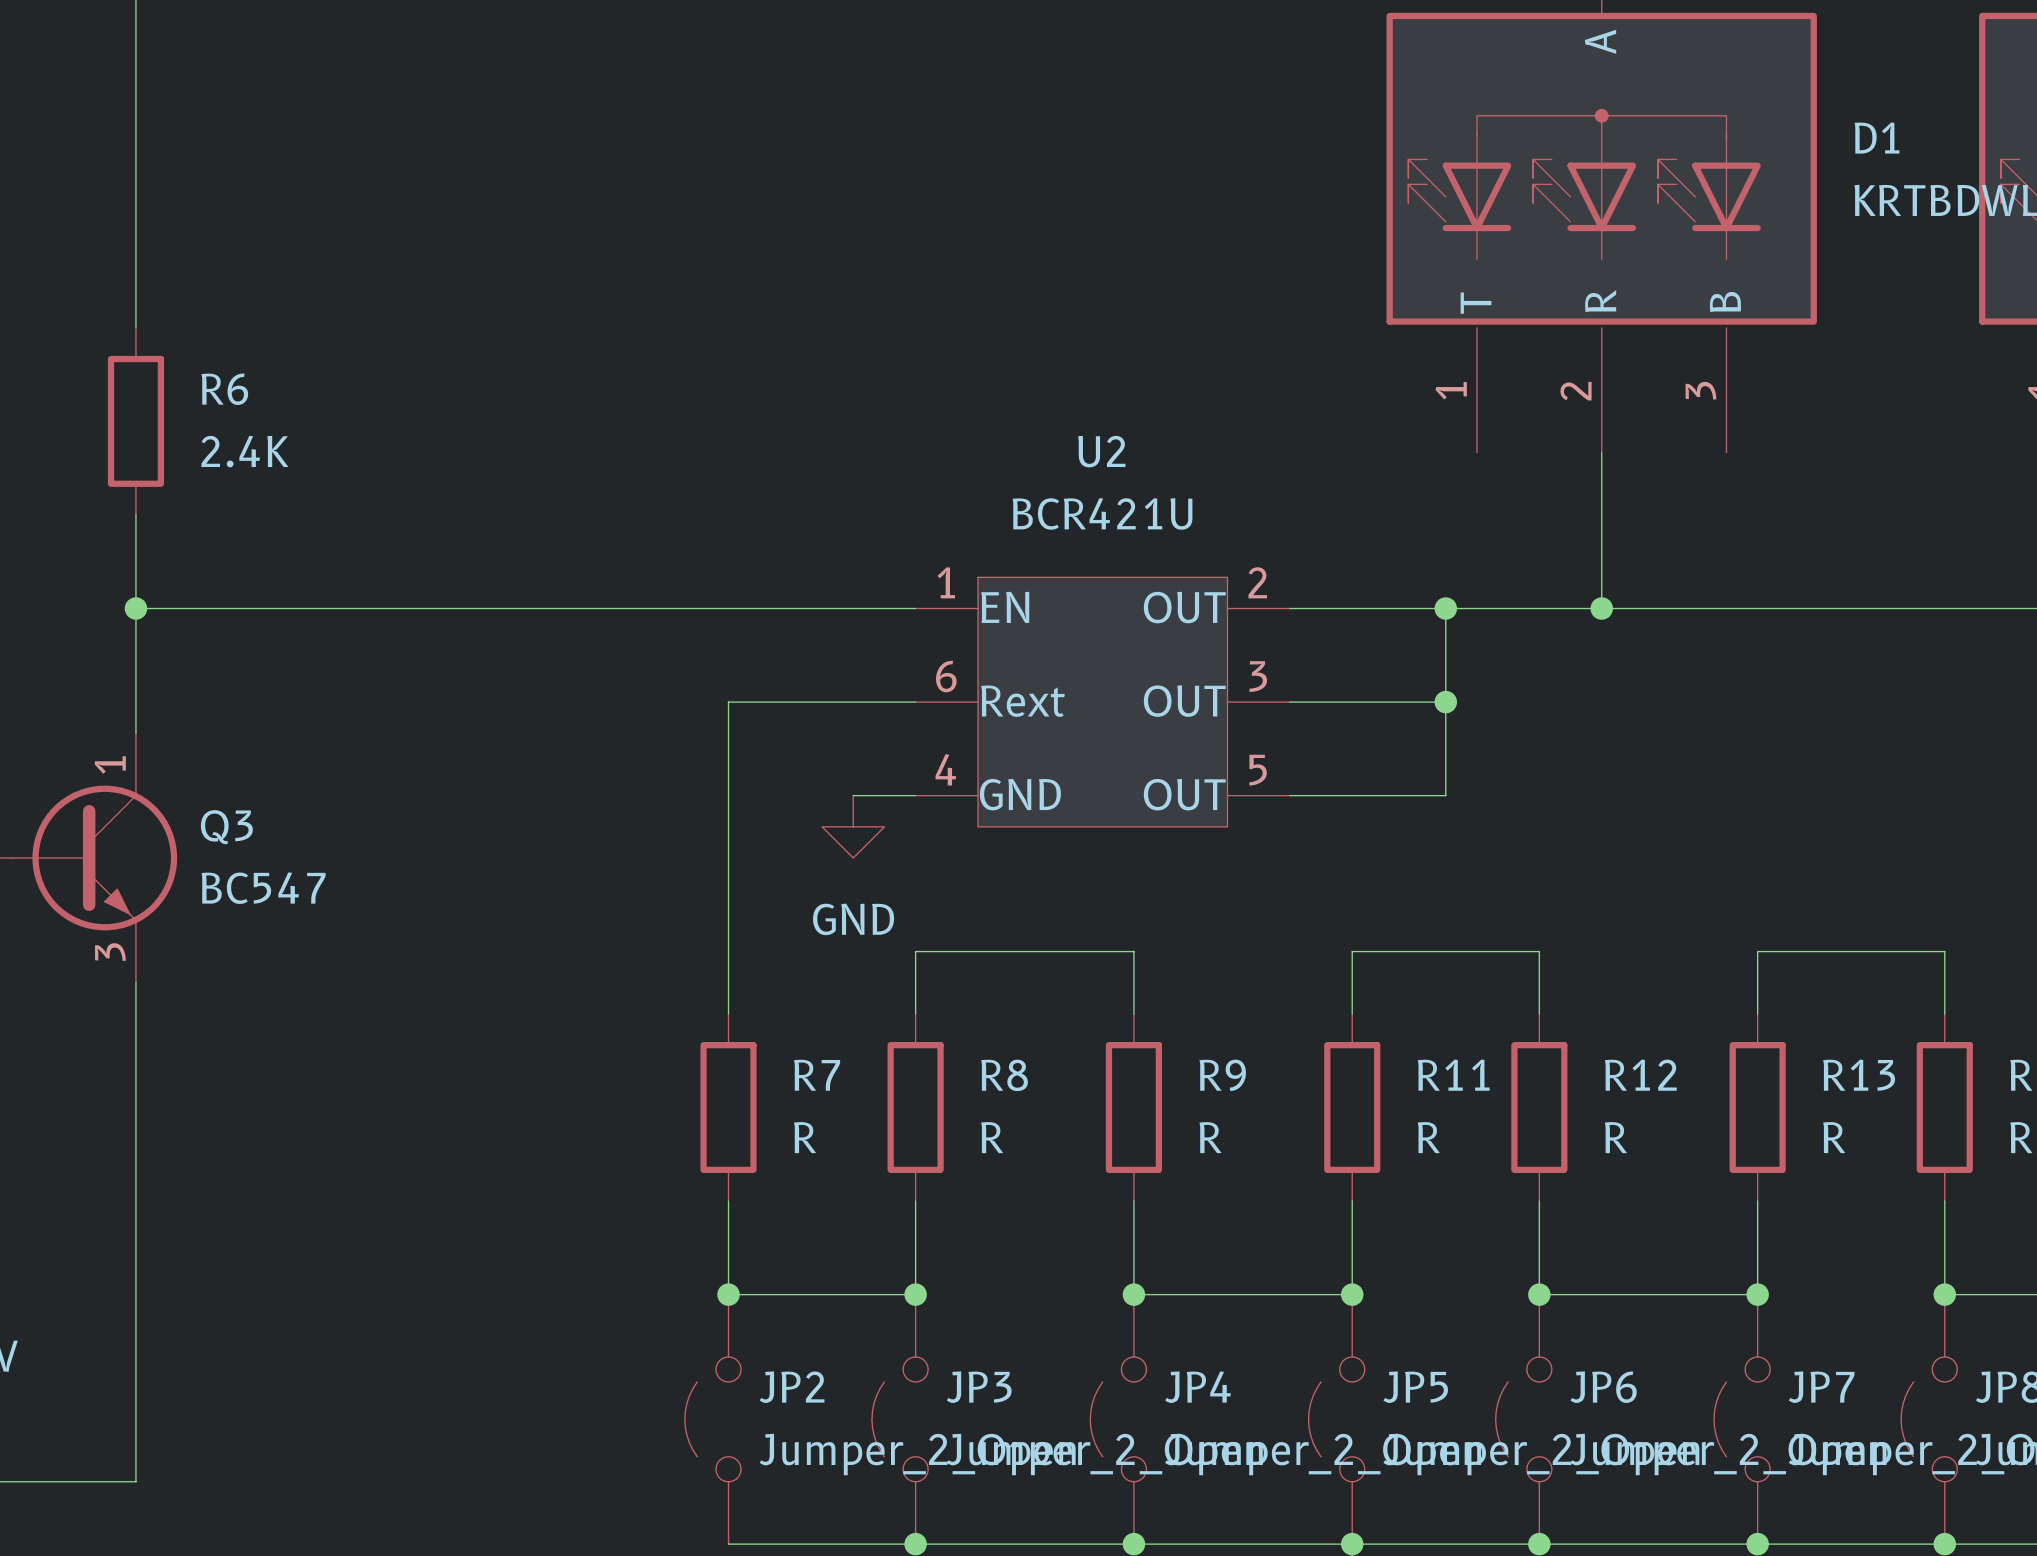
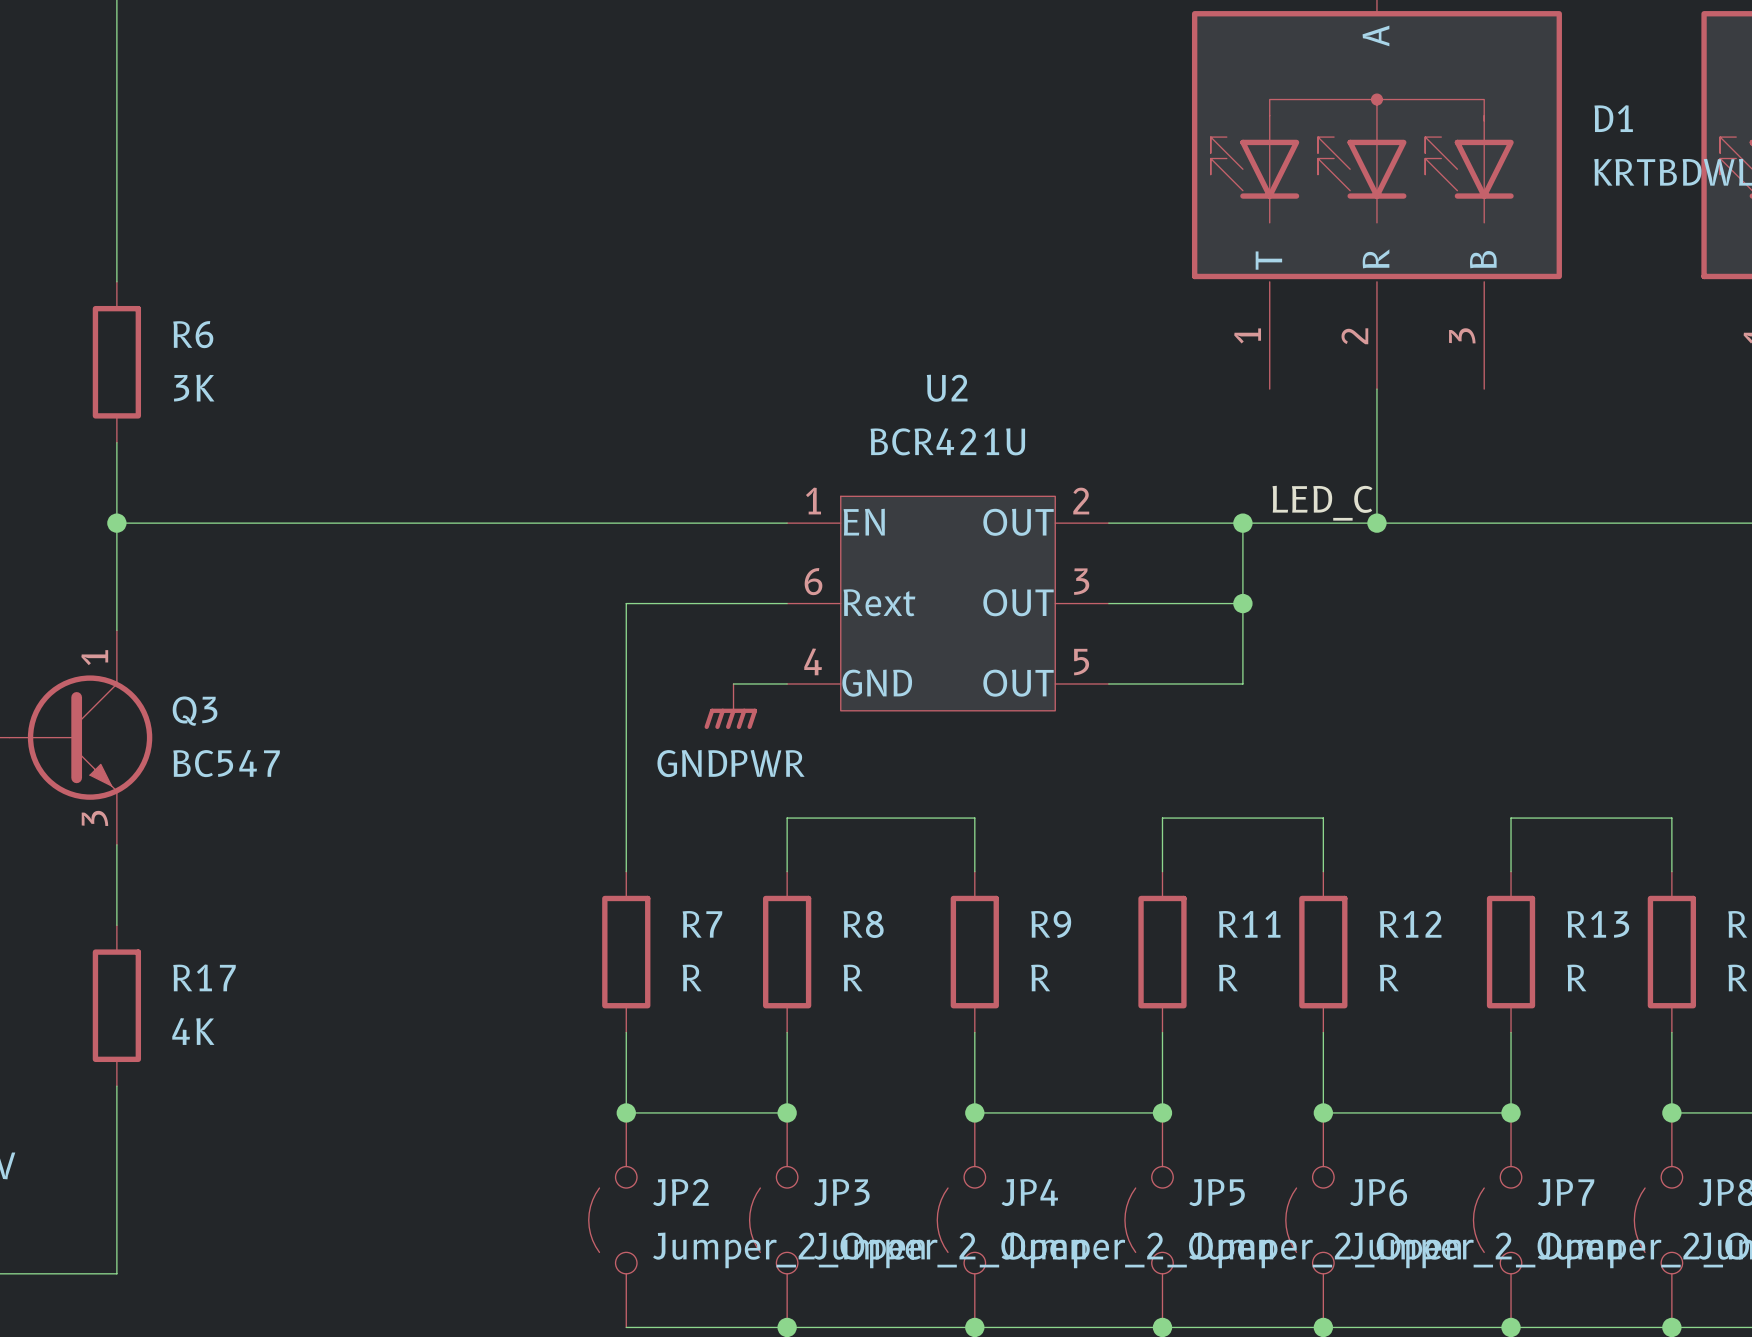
R6 value: 2.4K (244, 451) -> 3K (194, 388)
label: none -> LED_C (1322, 503)
power symbol: GND (853, 826) -> GNDPWR (730, 706)
wire: (135, 1076) (135, 1263) -> none
R17: none -> 4K (116, 1005)

